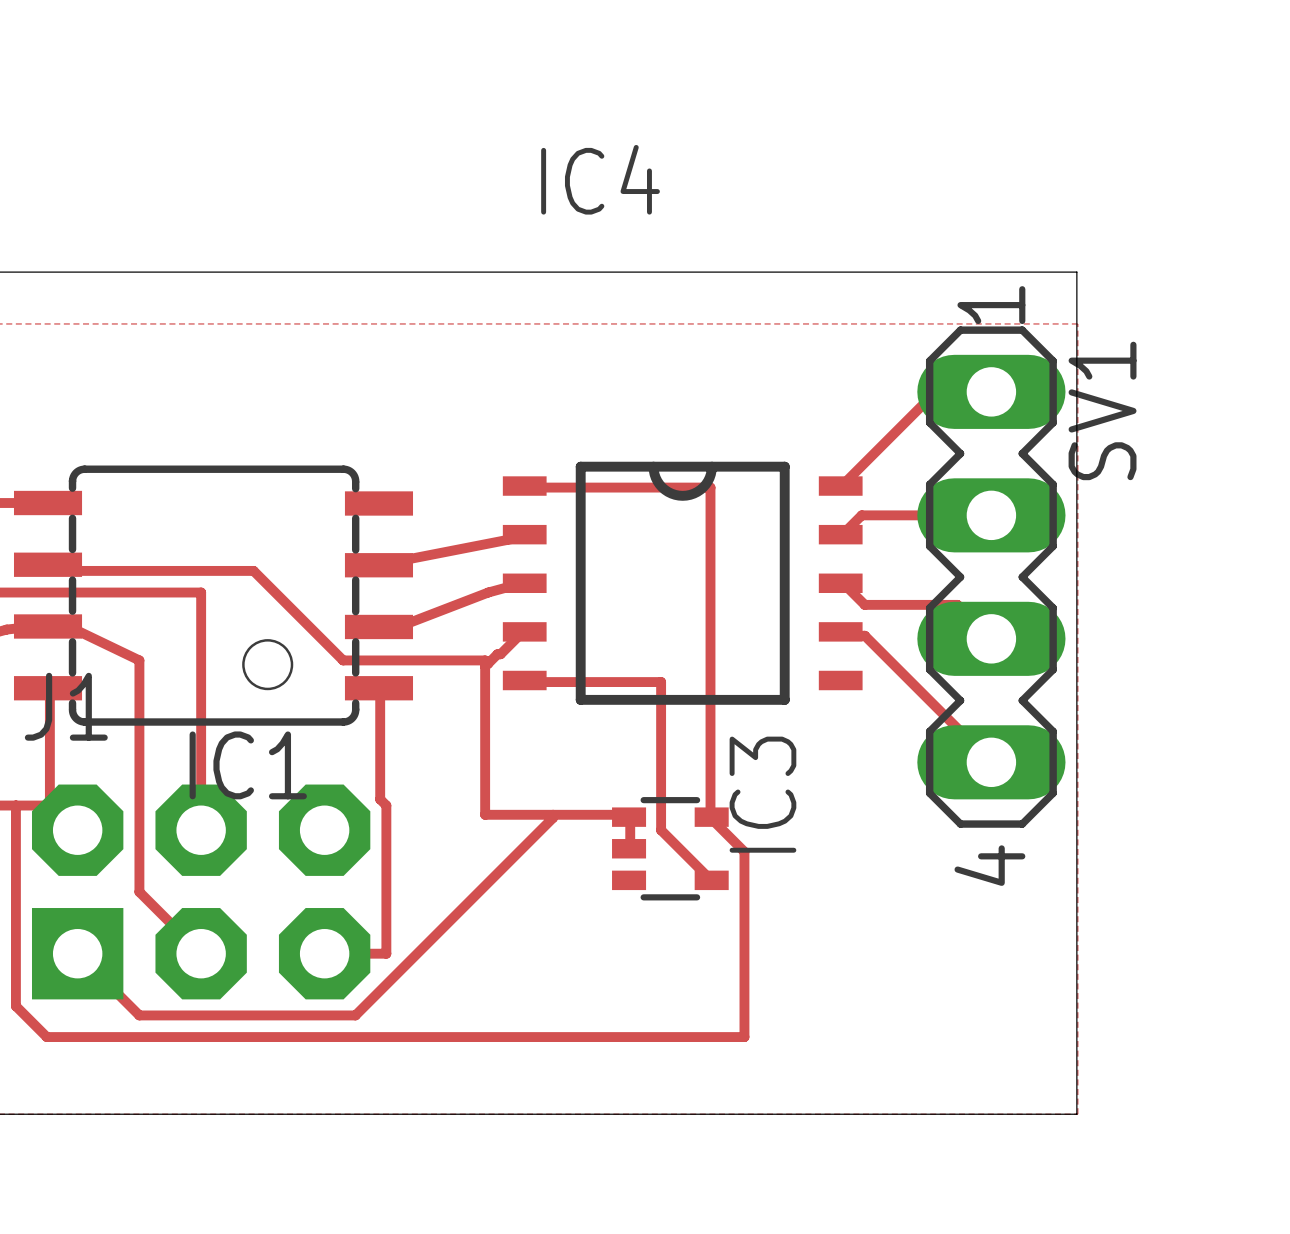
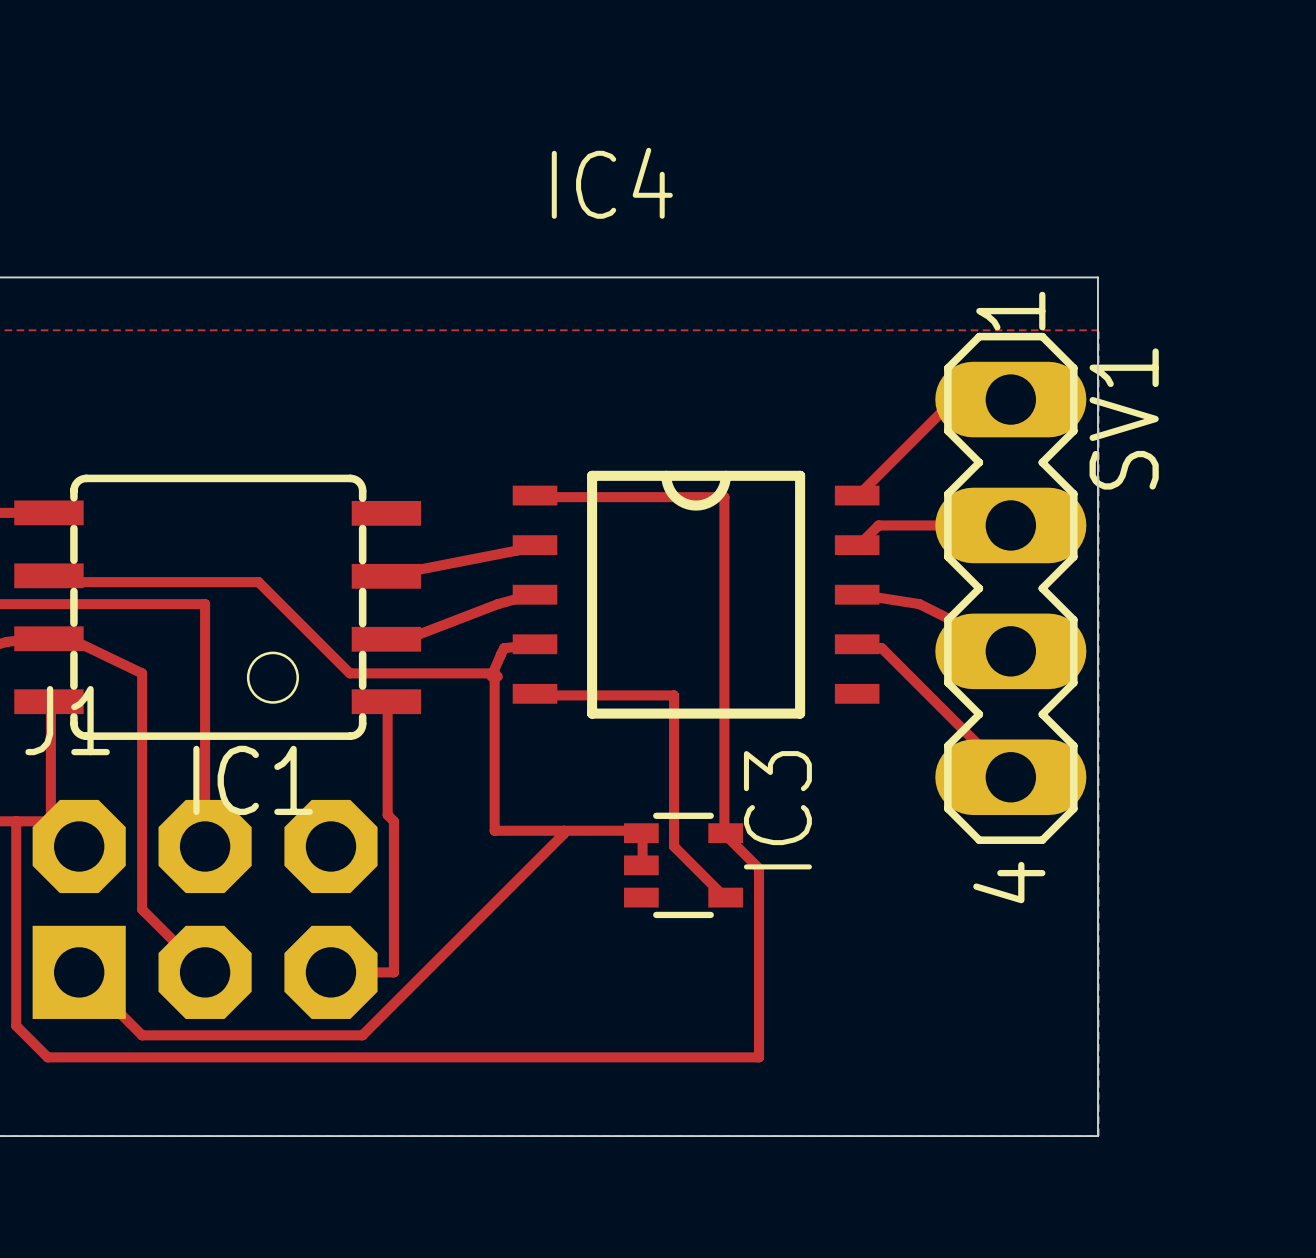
track: (843, 583) (864, 604) (957, 604) (991, 638) -> (859, 594) (919, 604) (1010, 651)
track: (522, 632) (485, 666) -> (532, 645) (504, 648) (491, 676)

